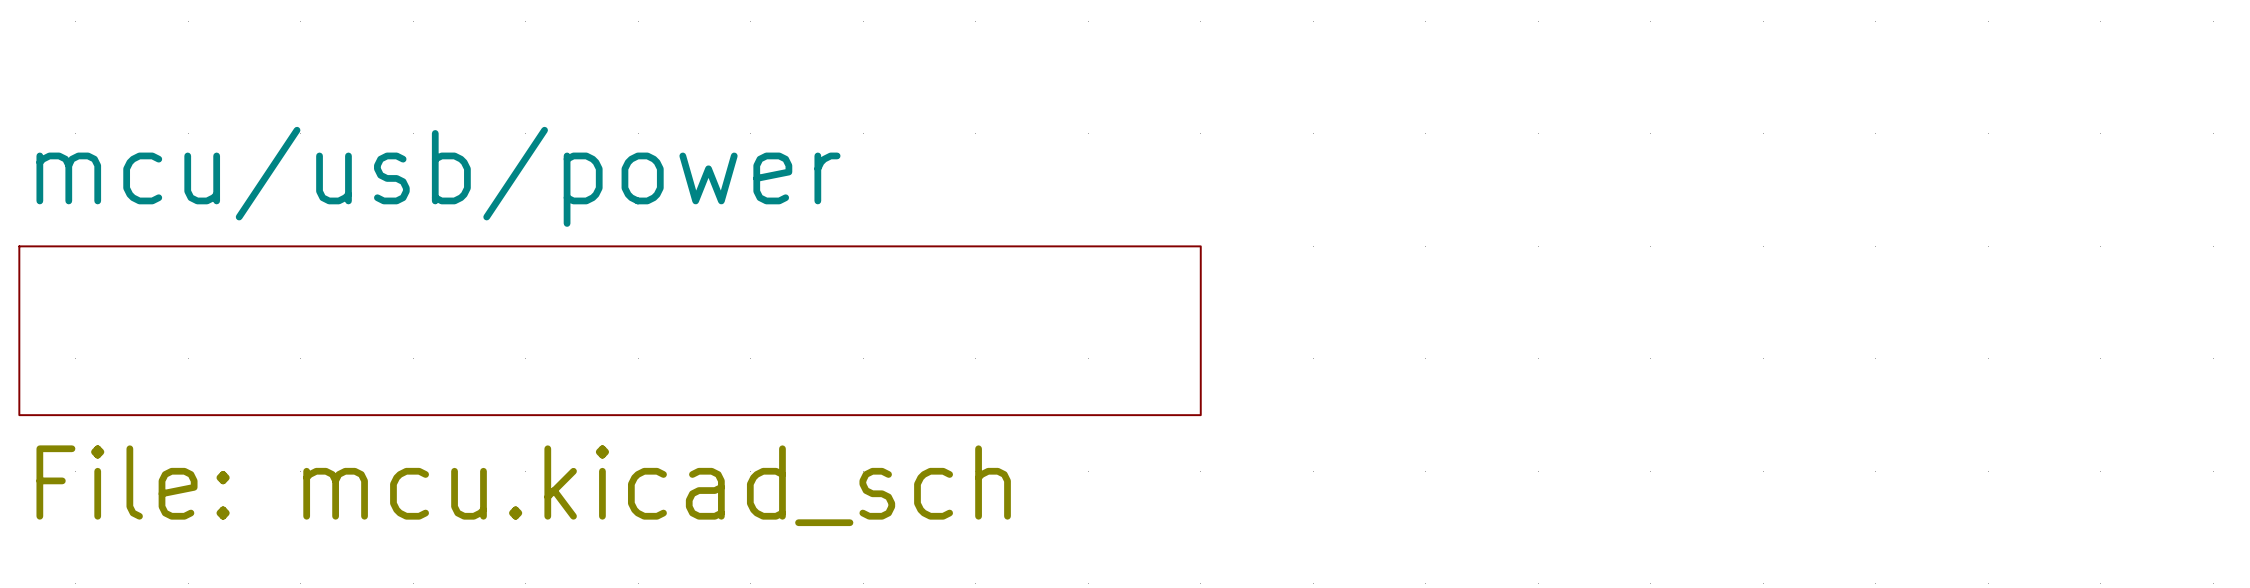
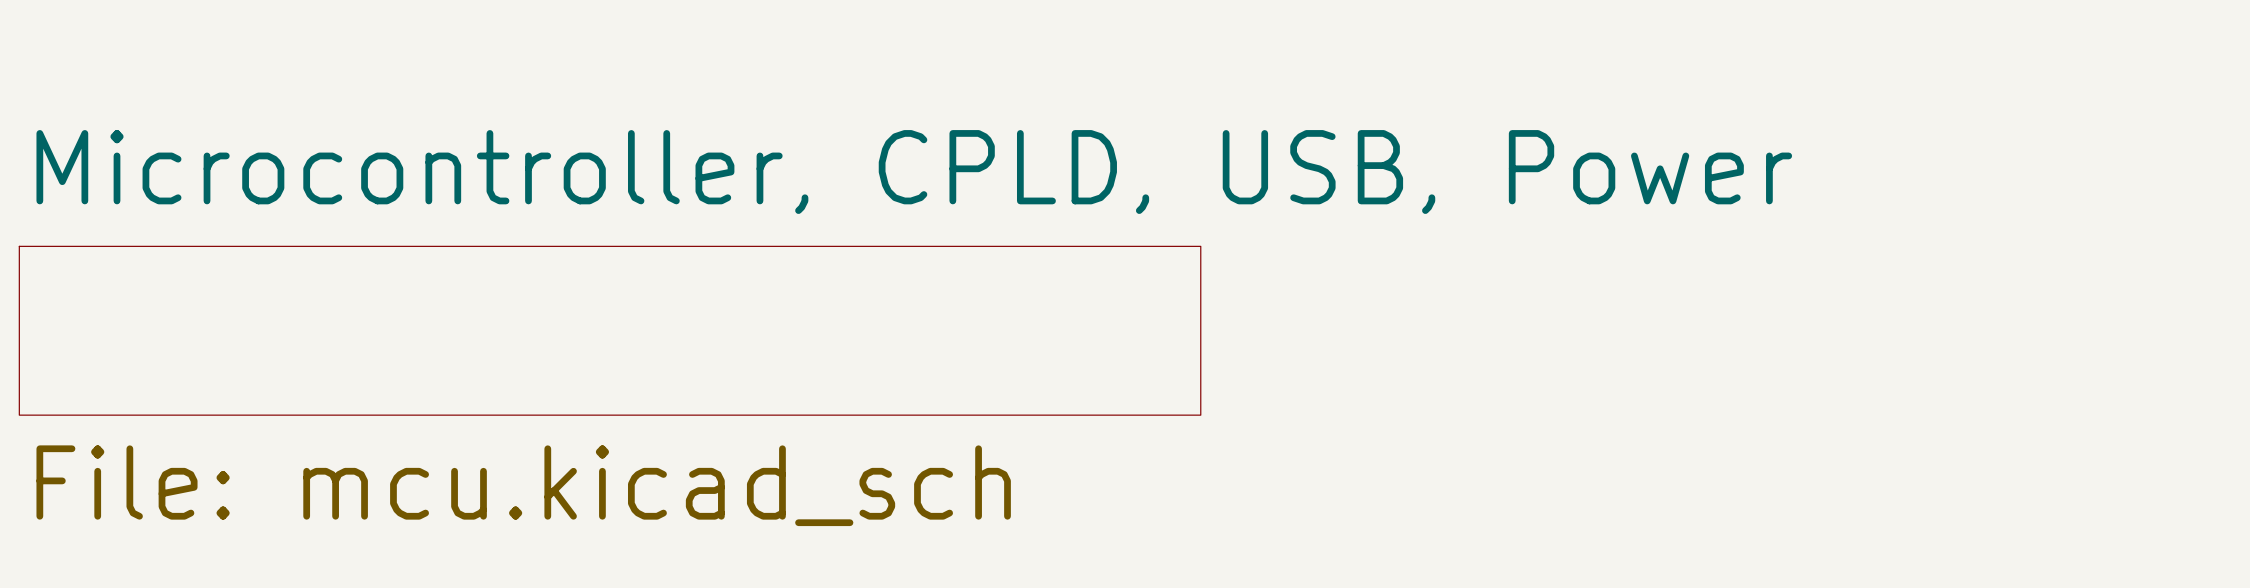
sheet mcu/usb/power name: mcu/usb/power (438, 176) -> Microcontroller, CPLD, USB, Power (914, 172)

